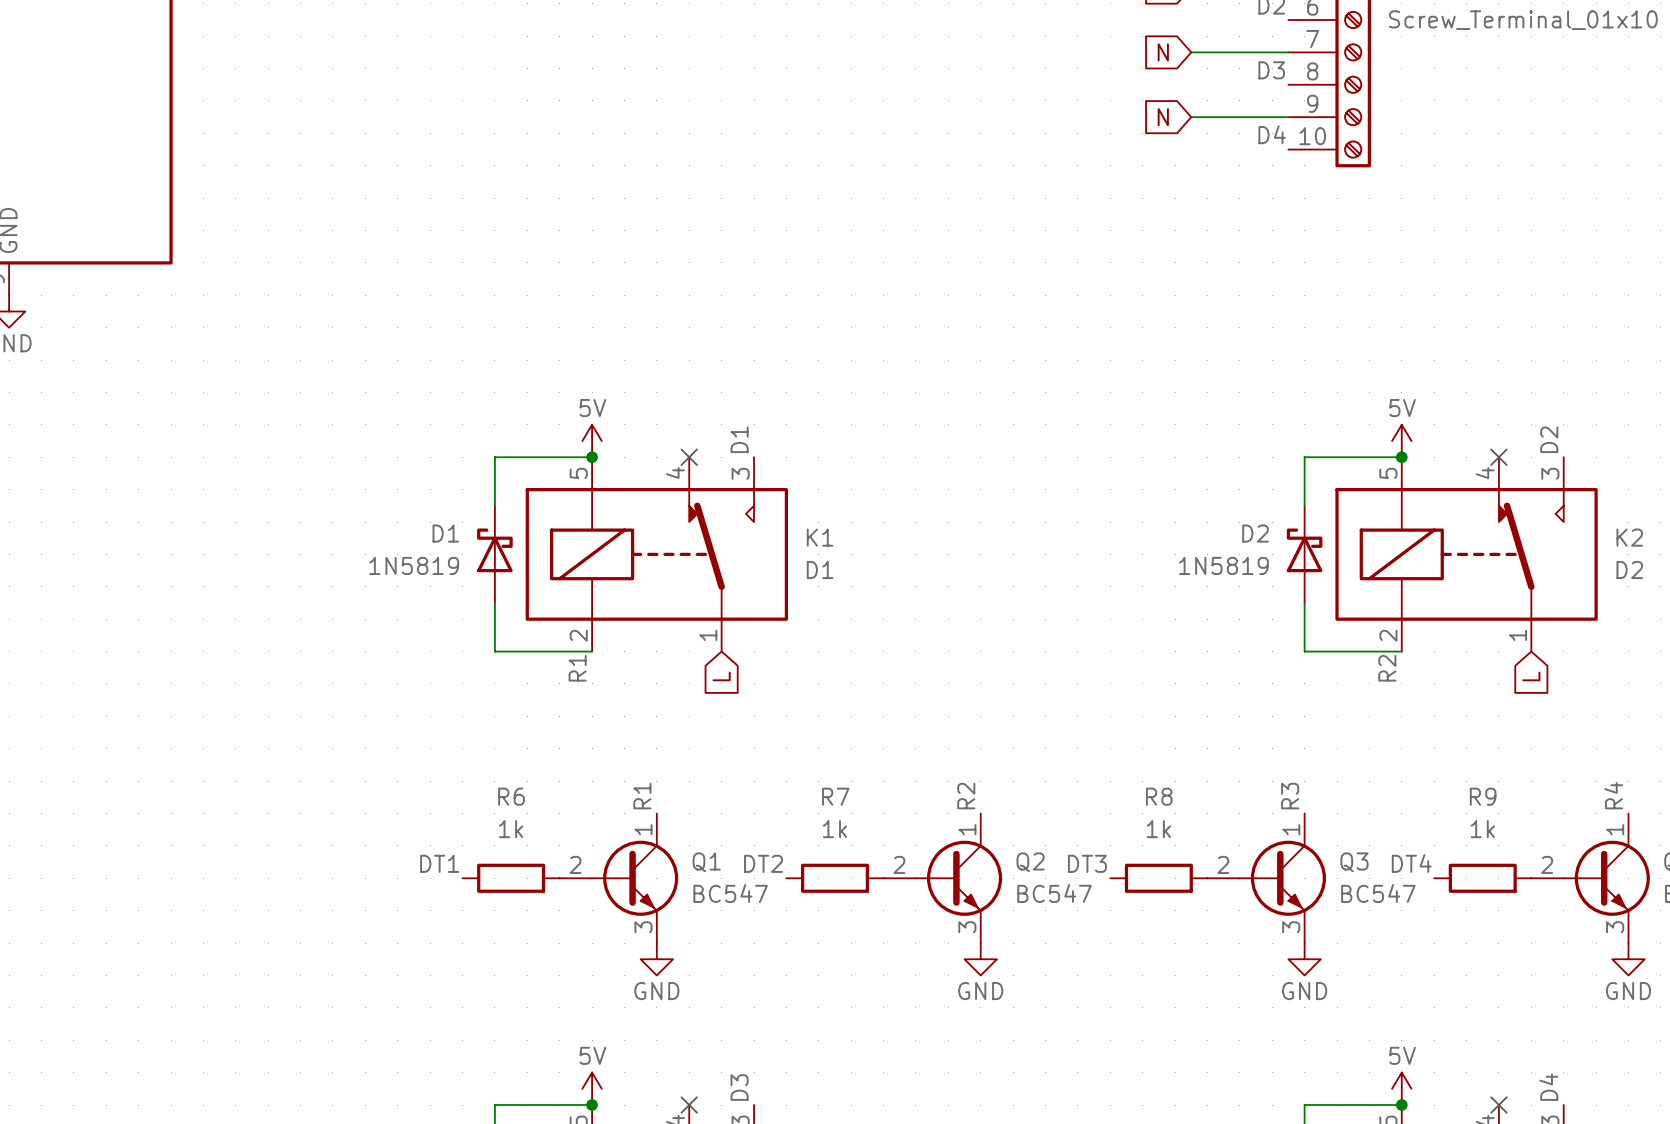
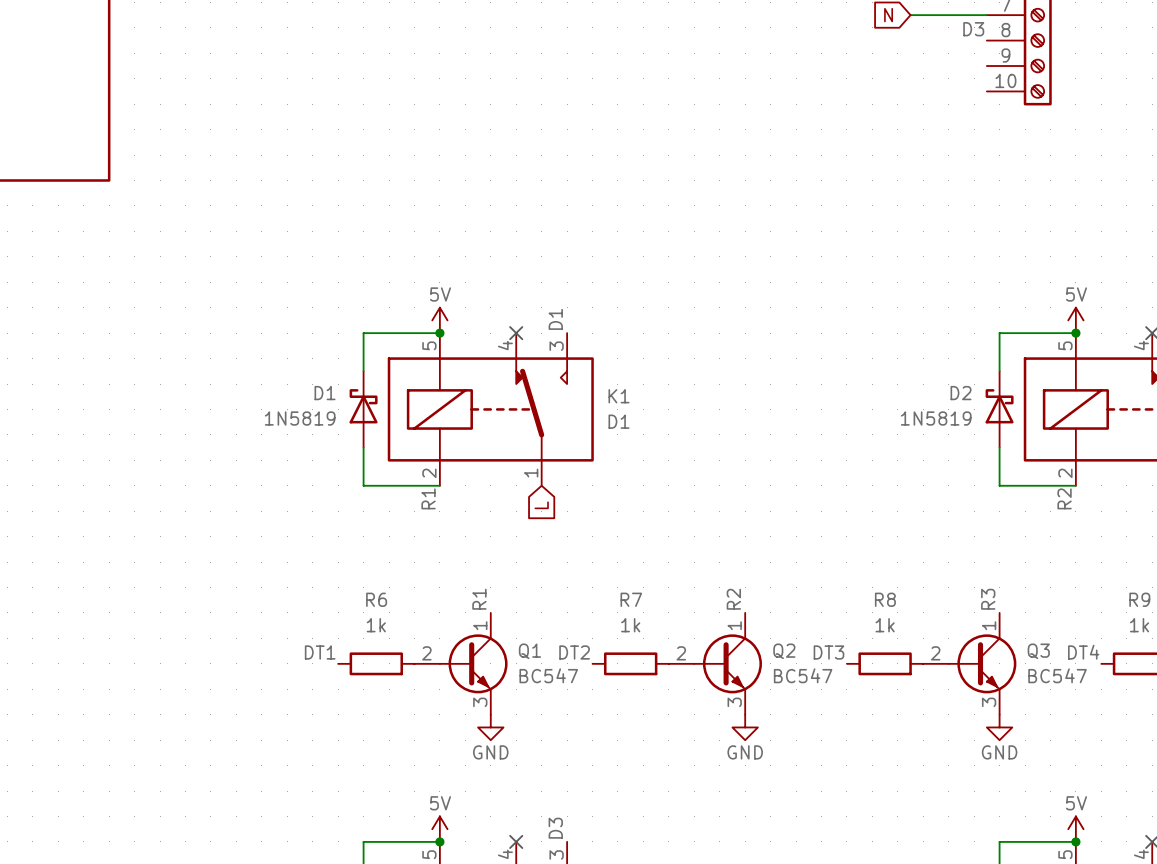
global label: N (1163, 117) -> none
wire: (1191, 117) (1288, 117) -> none
label: D4 (1272, 134) -> none

